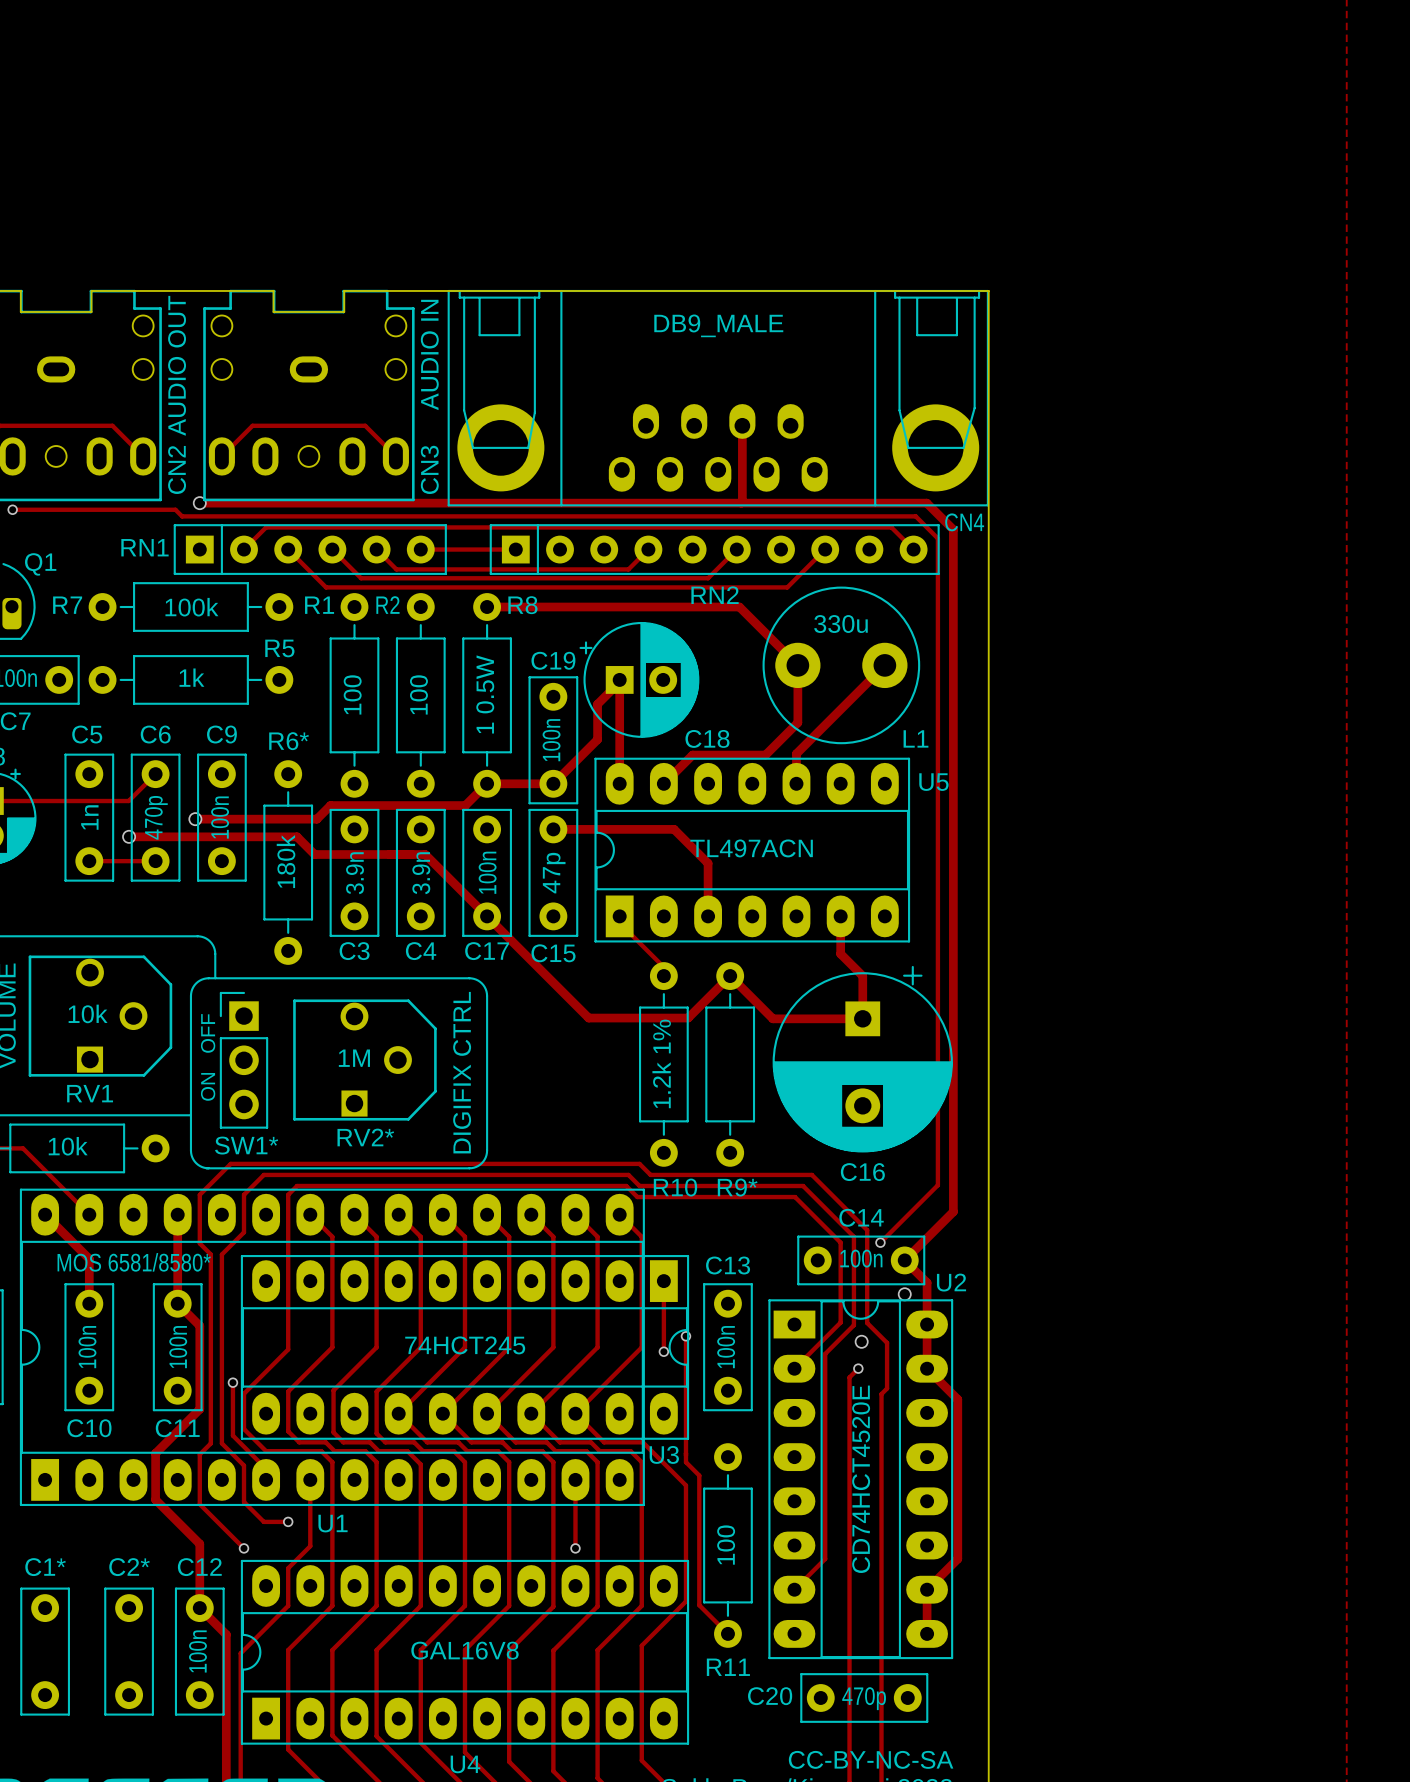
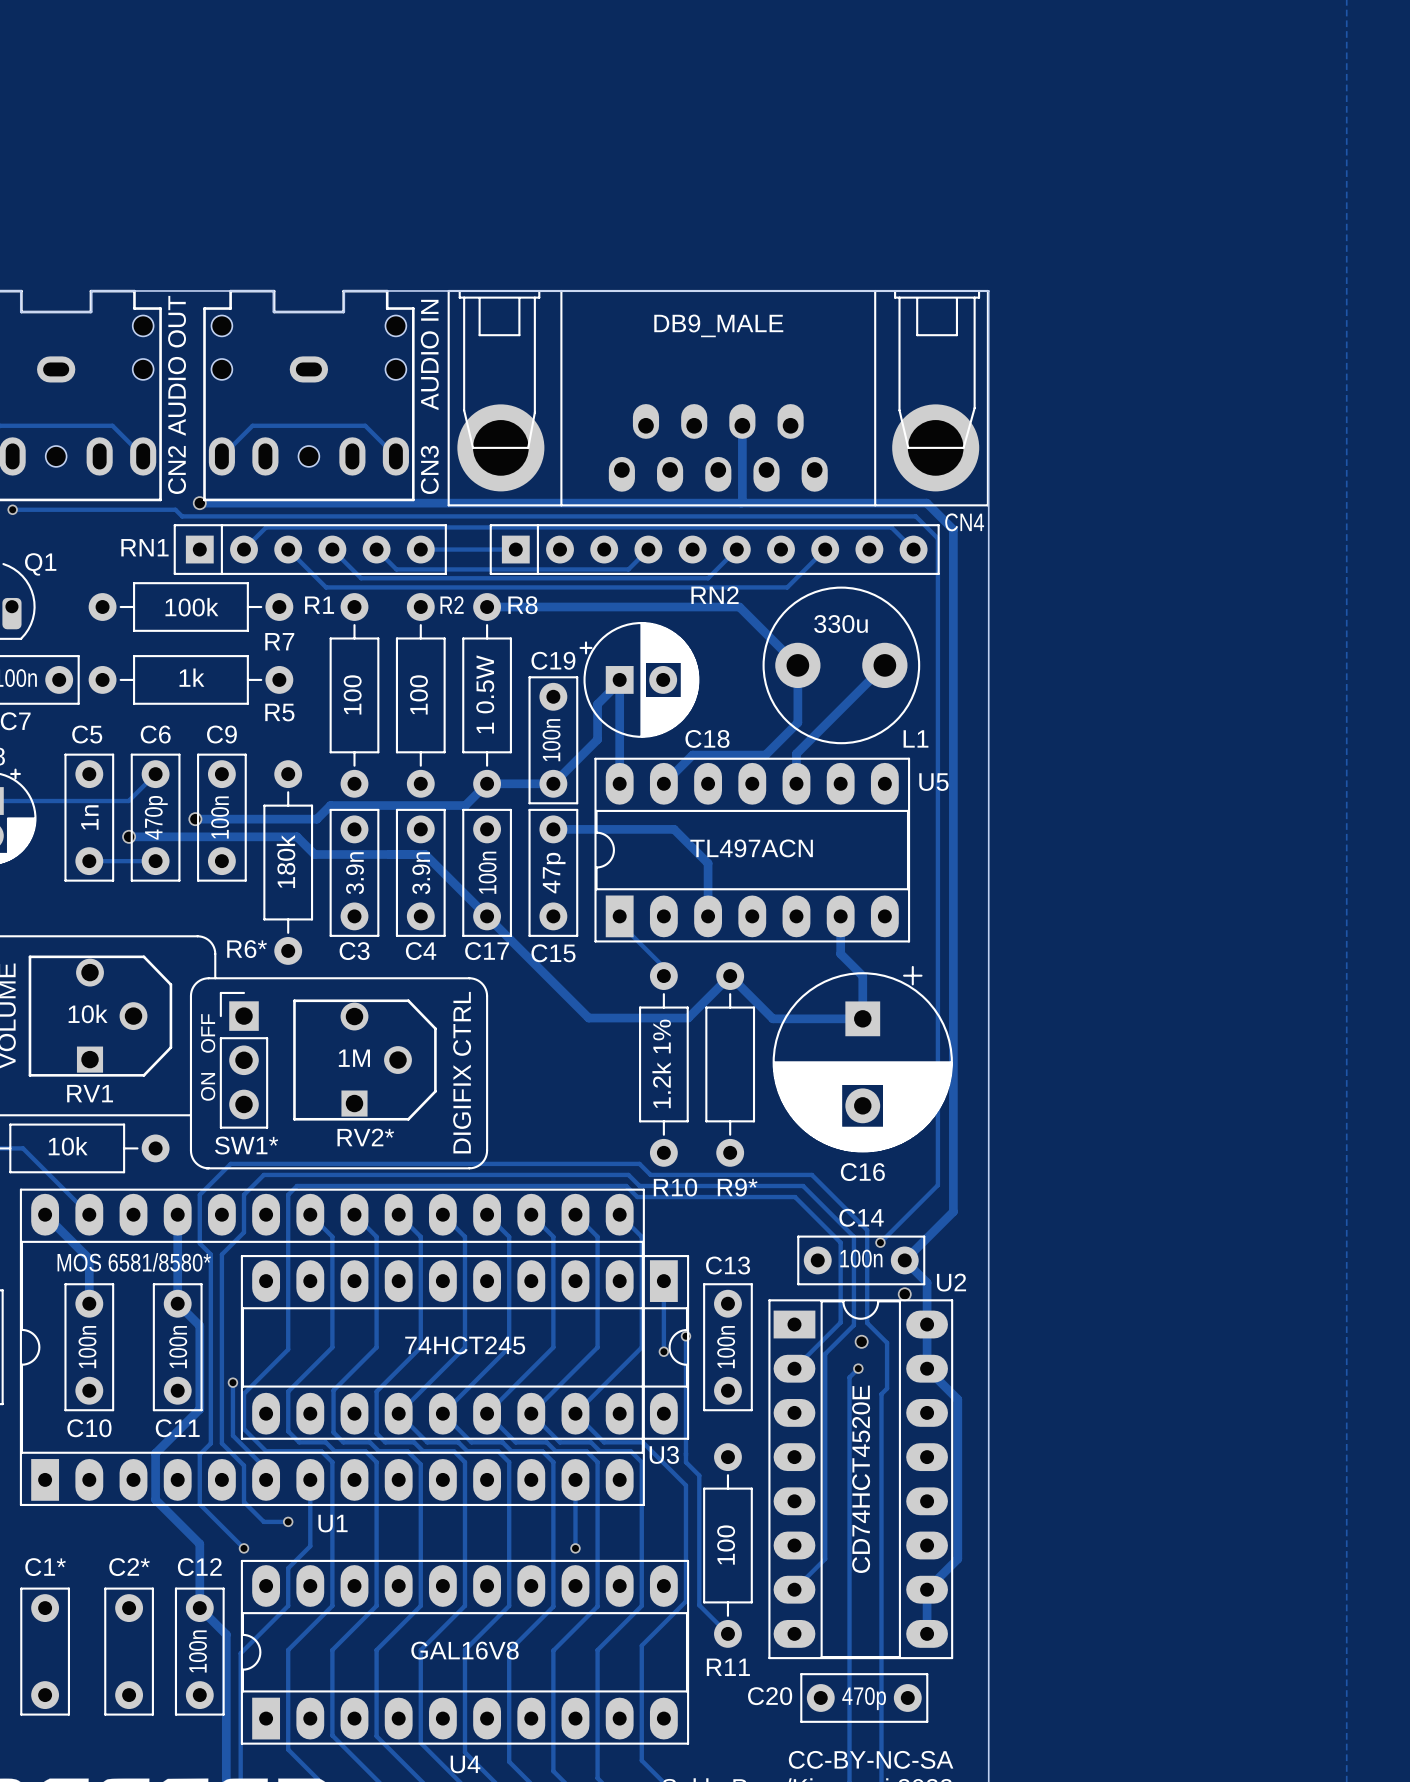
R7 name position: R7 (67, 605) -> R7 (279, 641)
R2 name position: R2 (387, 605) -> R2 (452, 605)
R5 name position: R5 (279, 648) -> R5 (279, 712)
text position: R6* (289, 741) -> R6* (247, 949)

